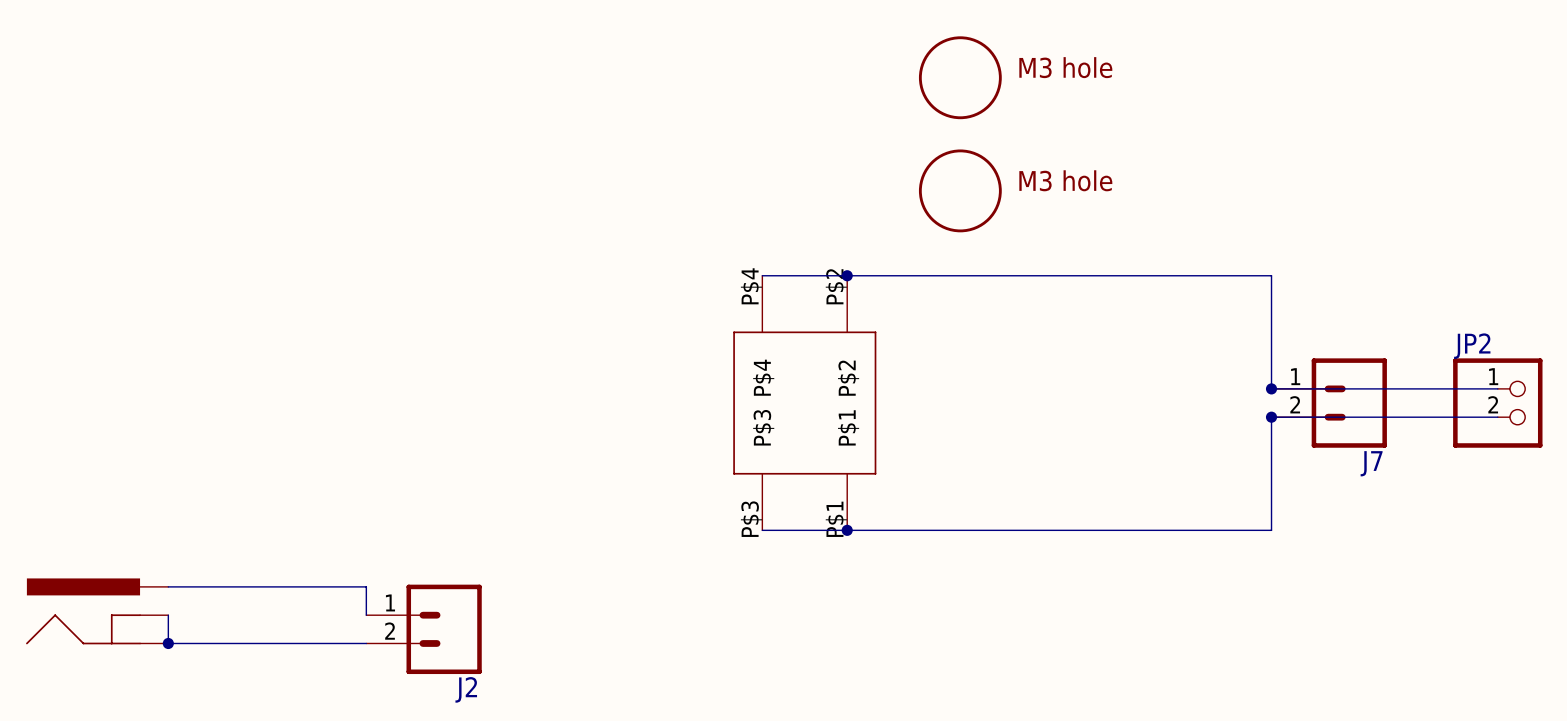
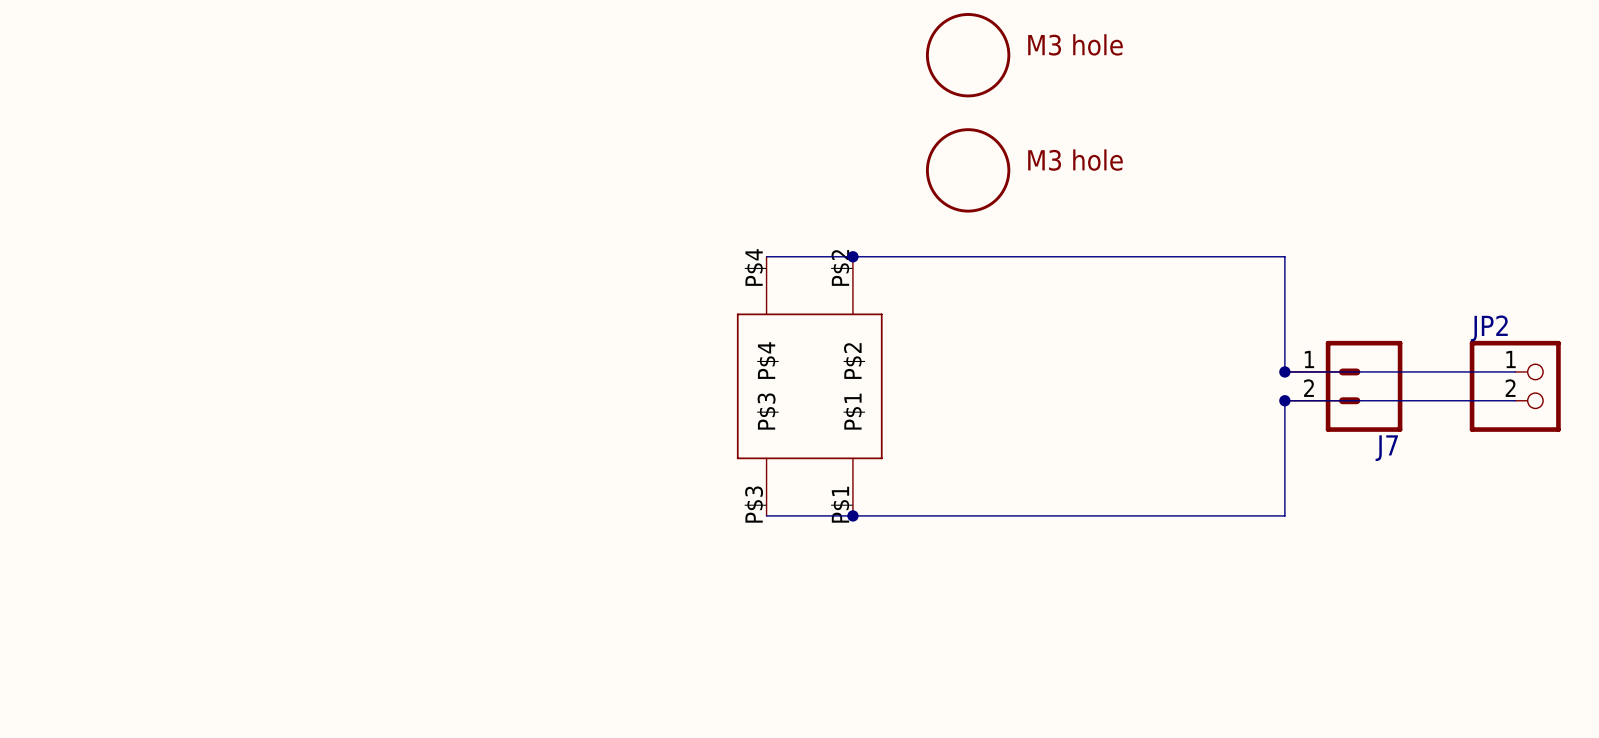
wire: (168, 586) (366, 586) (366, 615) -> none
part: (97, 611) -> none
wire: (168, 615) (168, 643) (366, 643) -> none
J2: (424, 629) -> none
junction: (168, 643) -> none

